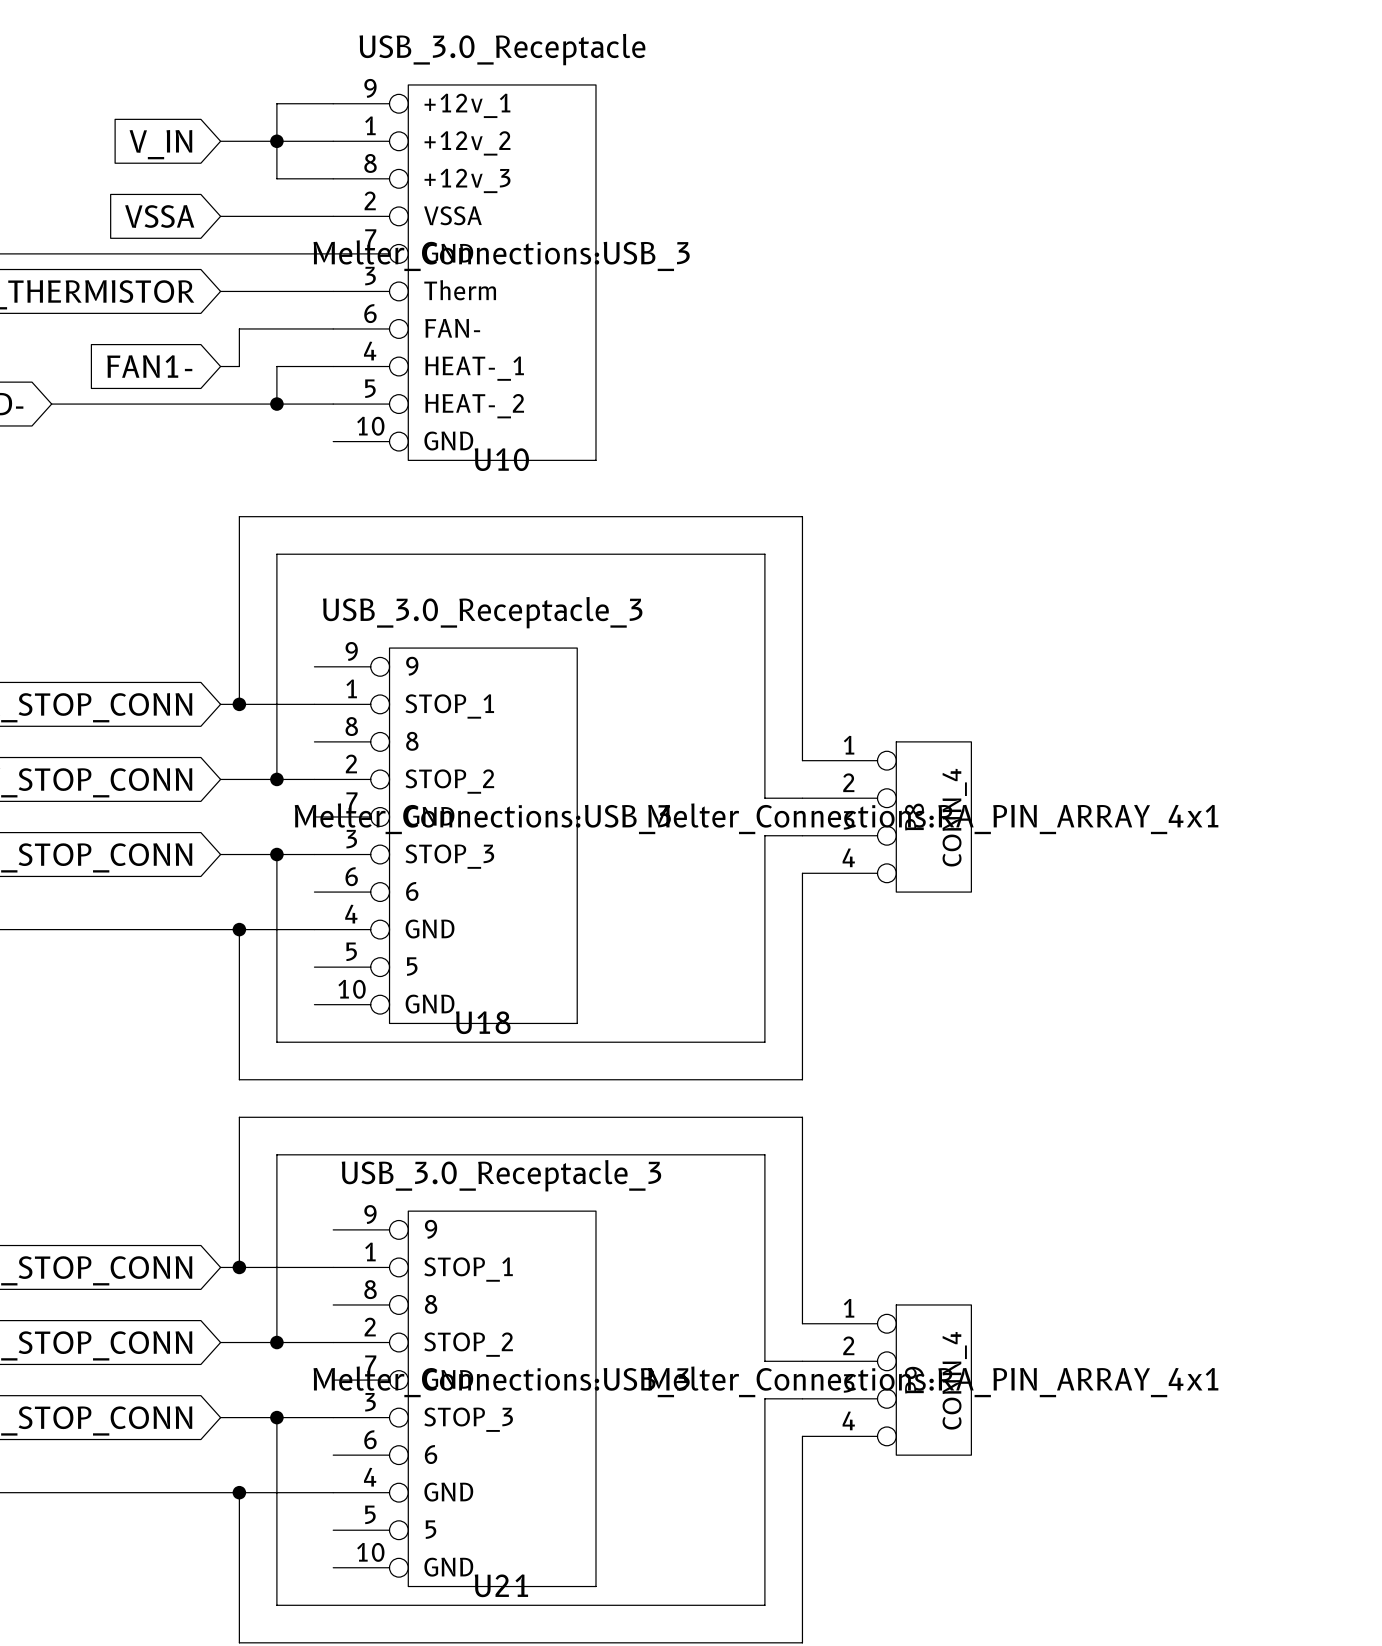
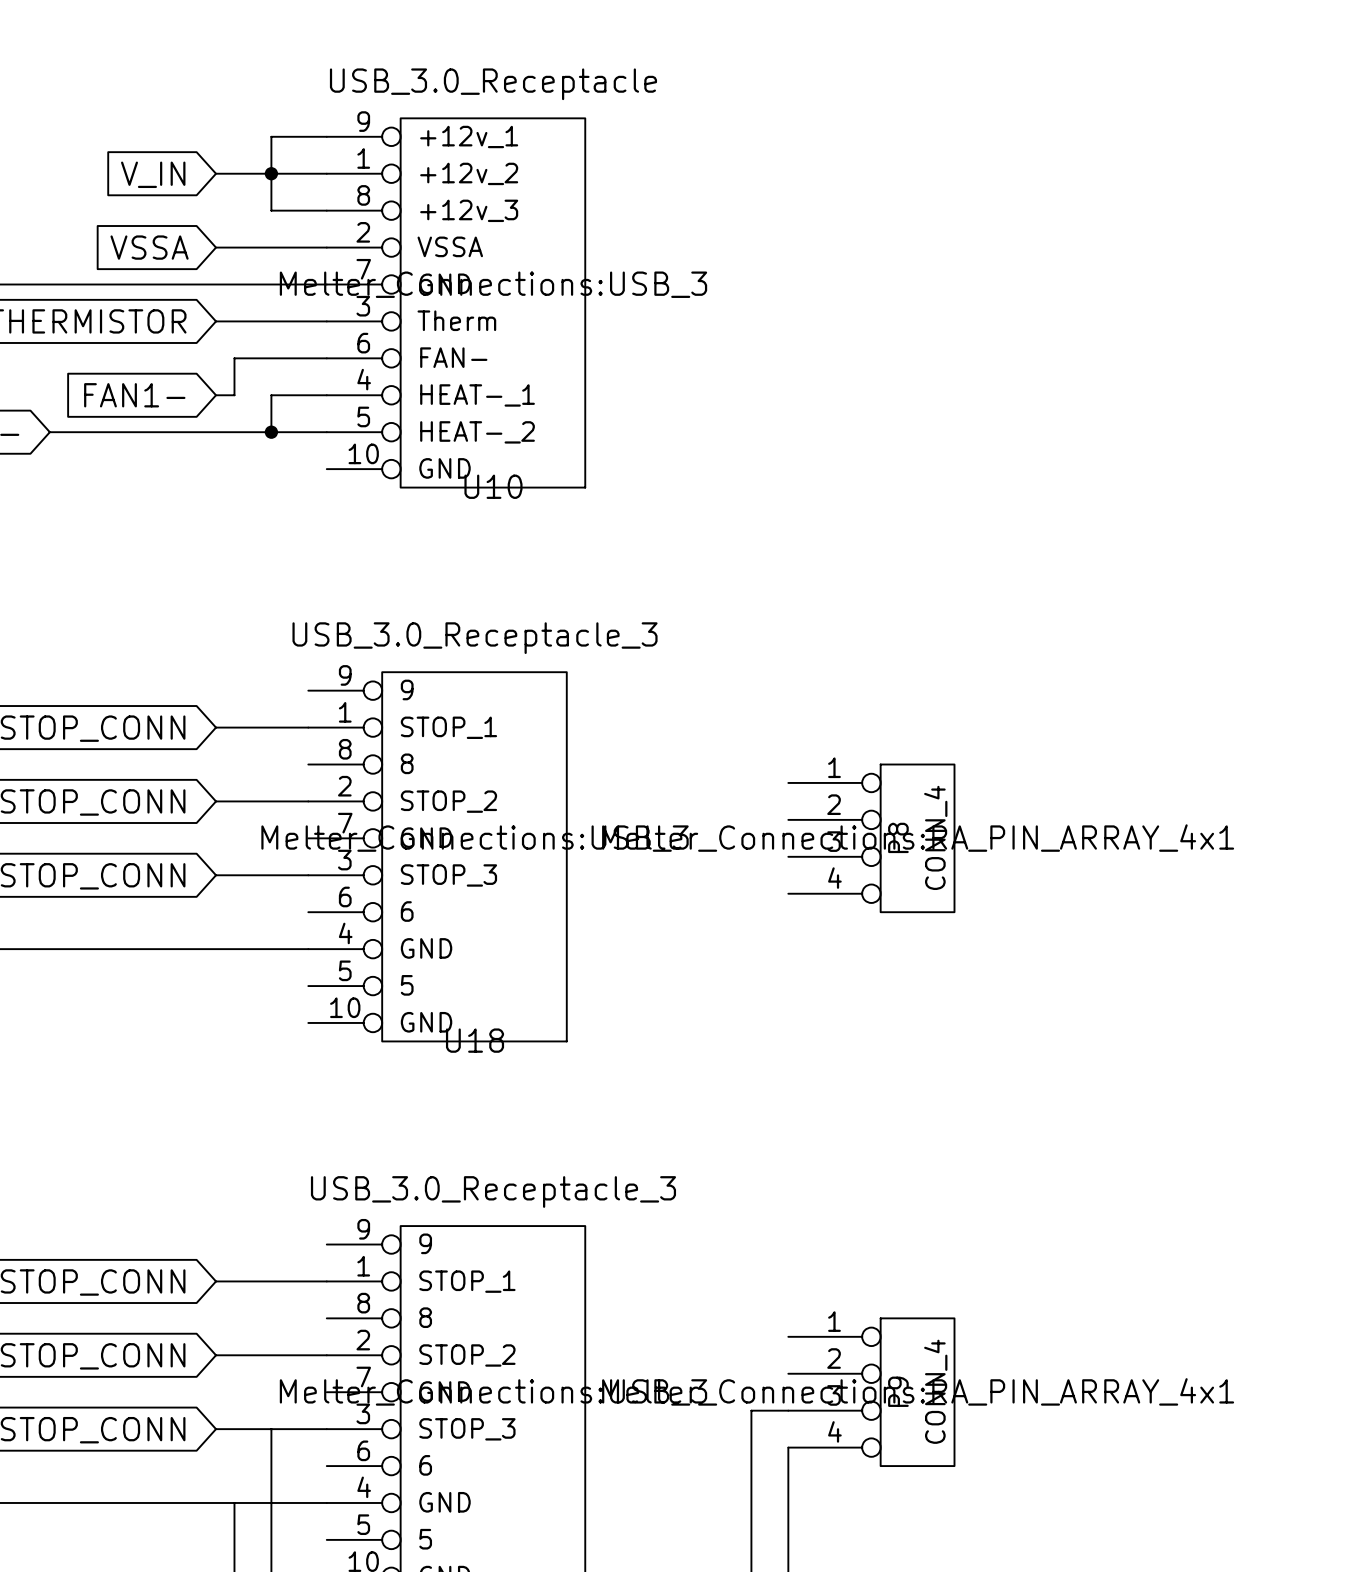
wire: (239, 704) (239, 516) (802, 516) (802, 760) -> none
junction: (239, 704) -> none
wire: (276, 779) (276, 554) (764, 554) (764, 798) (802, 798) -> none
junction: (276, 779) -> none
wire: (802, 835) (764, 835) (764, 1042) (276, 1042) (276, 854) -> none
junction: (276, 854) -> none
wire: (802, 873) (802, 1079) (239, 1079) (239, 929) -> none
junction: (239, 929) -> none
wire: (239, 1267) (239, 1117) (802, 1117) (802, 1323) -> none
junction: (239, 1267) -> none
wire: (276, 1342) (276, 1154) (764, 1154) (764, 1361) (802, 1361) -> none
junction: (276, 1342) -> none
junction: (276, 1417) -> none
junction: (239, 1492) -> none

